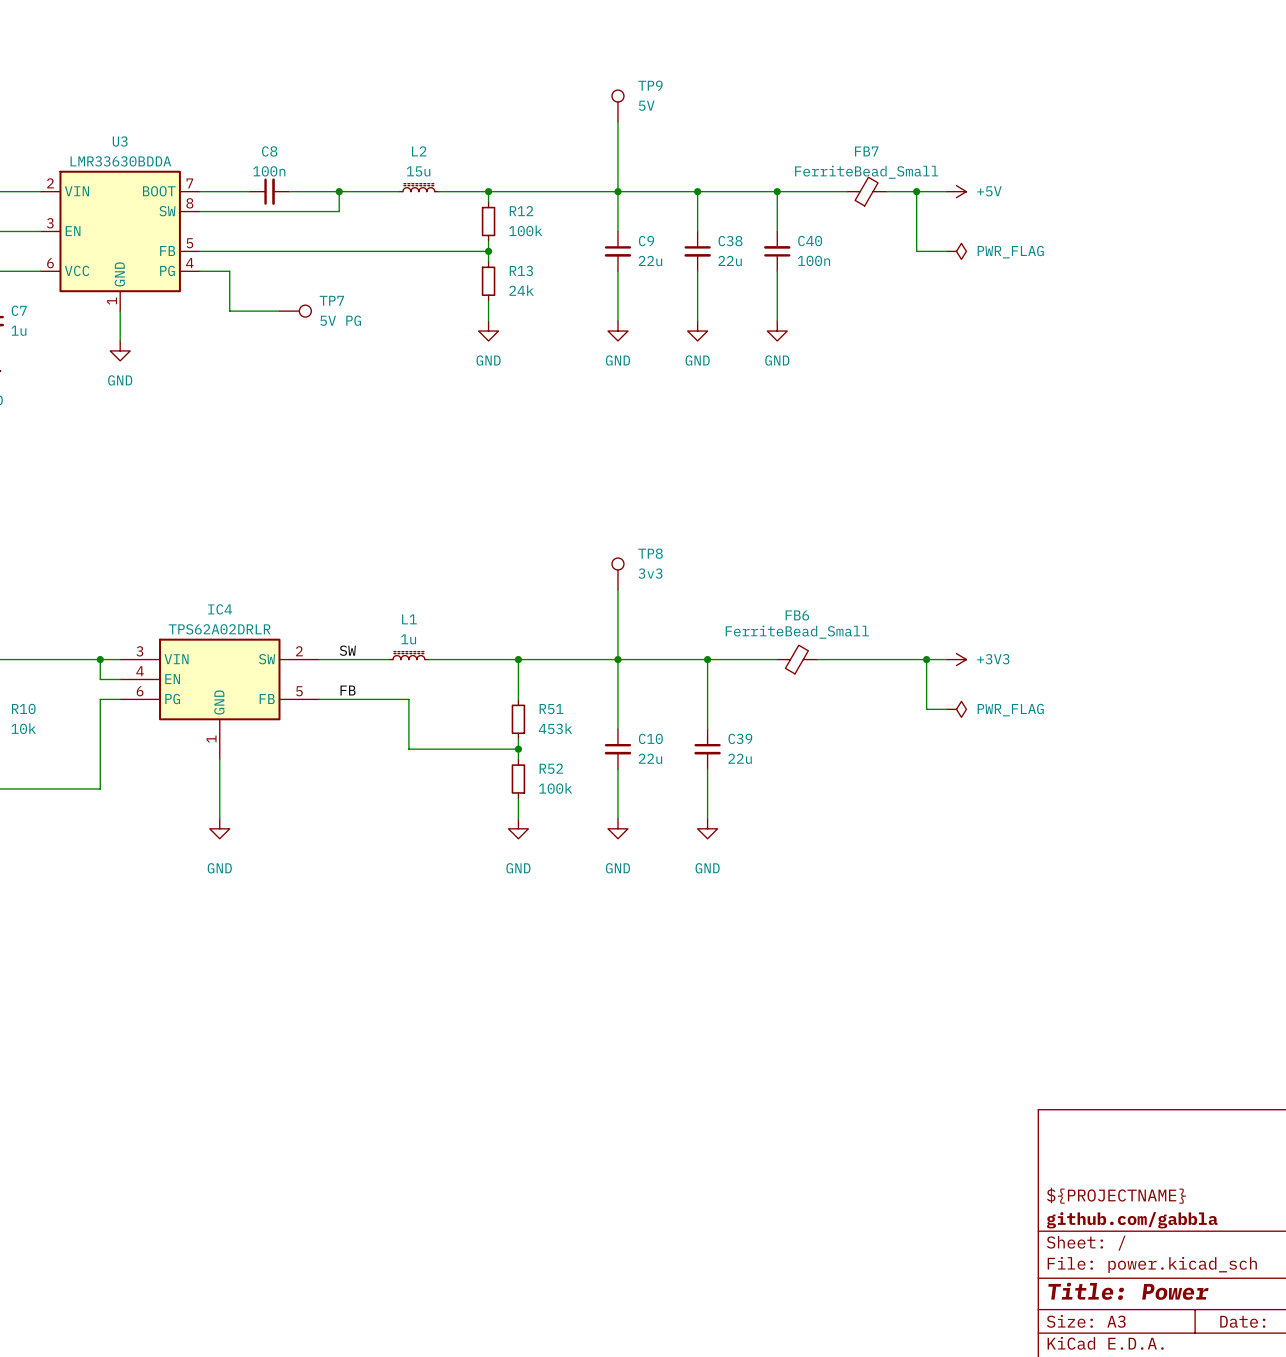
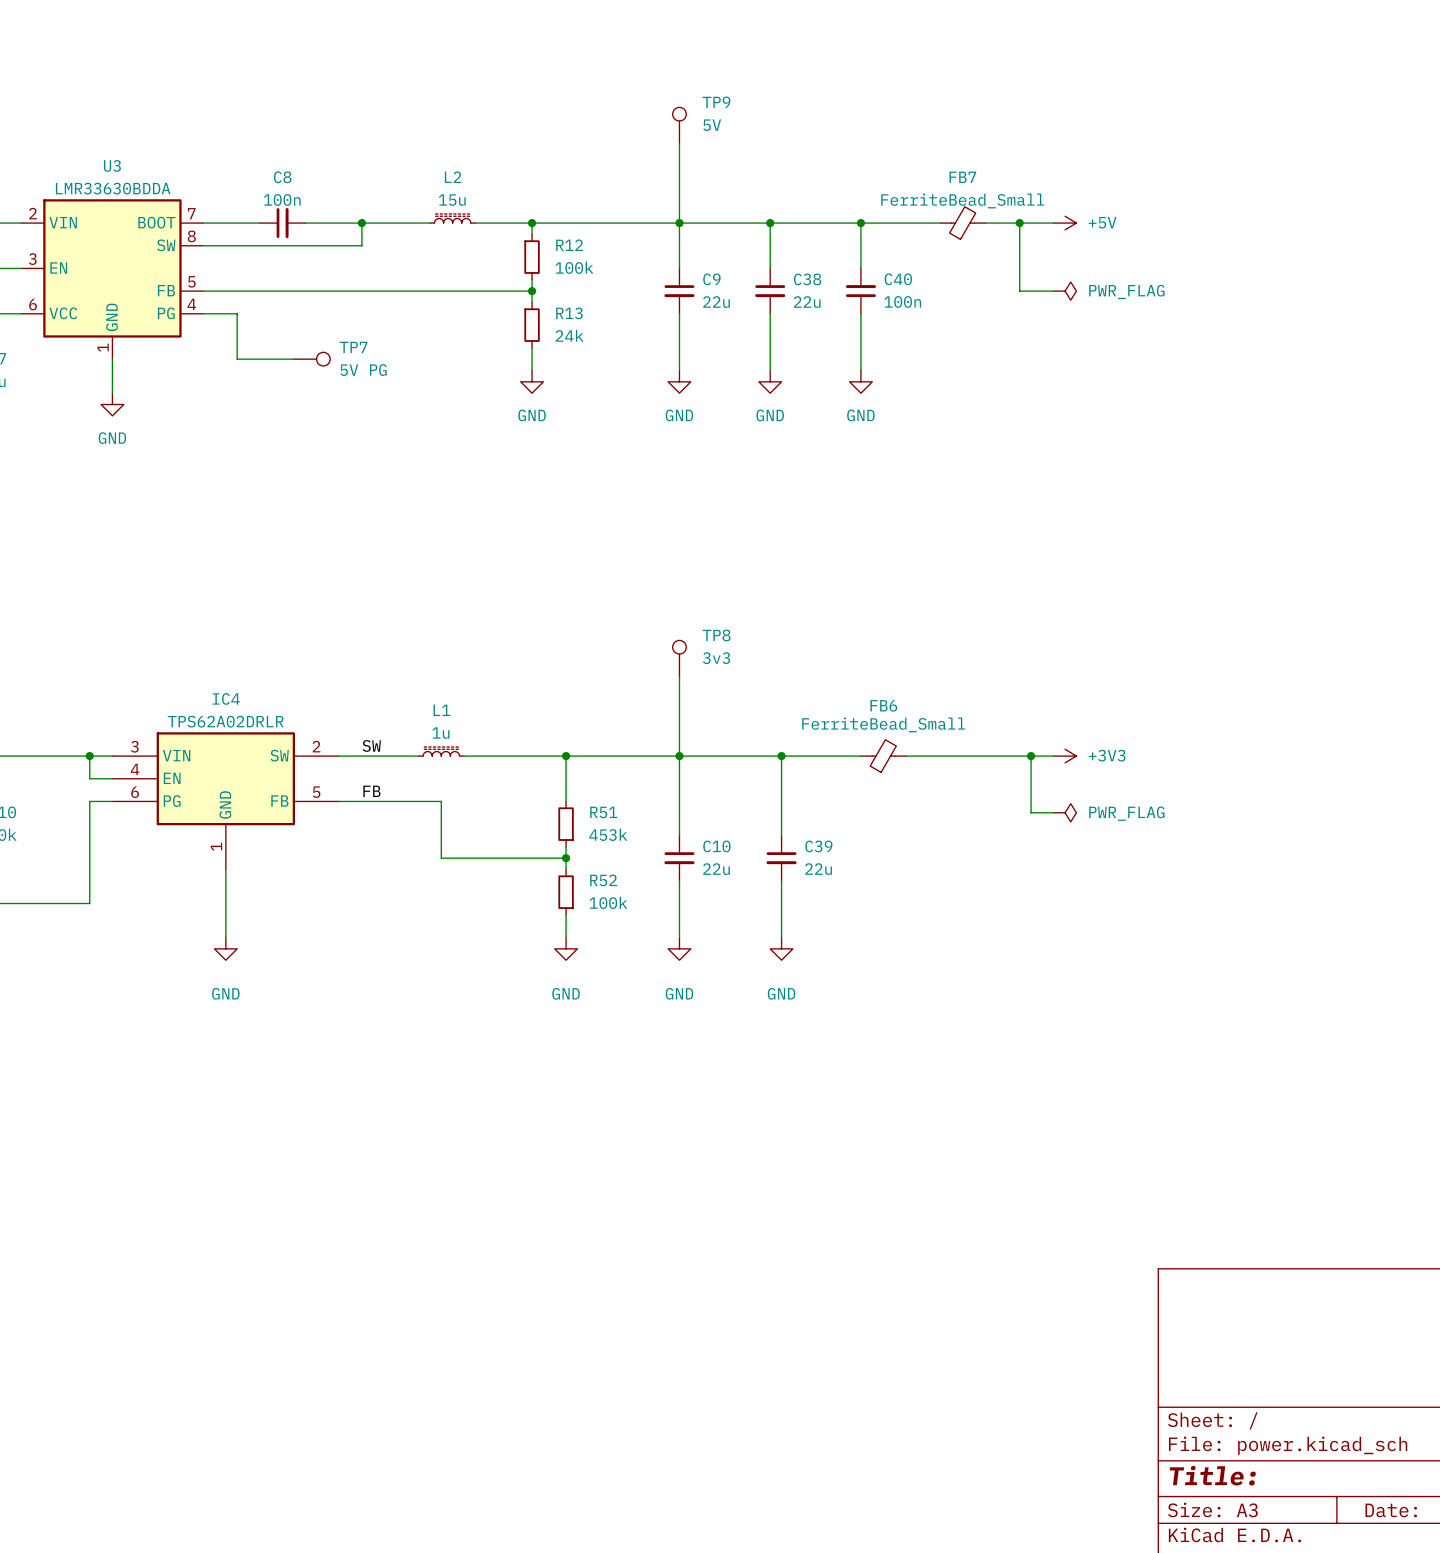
title block: ${PROJECTNAME} (1116, 1195) -> none
title block: github.com/gabbla (1132, 1220) -> none
title block: Title: Power (1128, 1291) -> Title: (1212, 1475)

